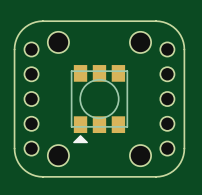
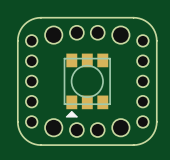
hole: none -> (76, 32)
hole: none -> (97, 32)
hole: none -> (76, 130)
hole: none -> (97, 130)

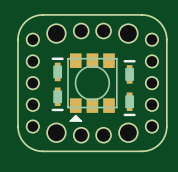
part: none -> (57, 69)
part: none -> (129, 71)
part: none -> (57, 99)
part: none -> (129, 104)

